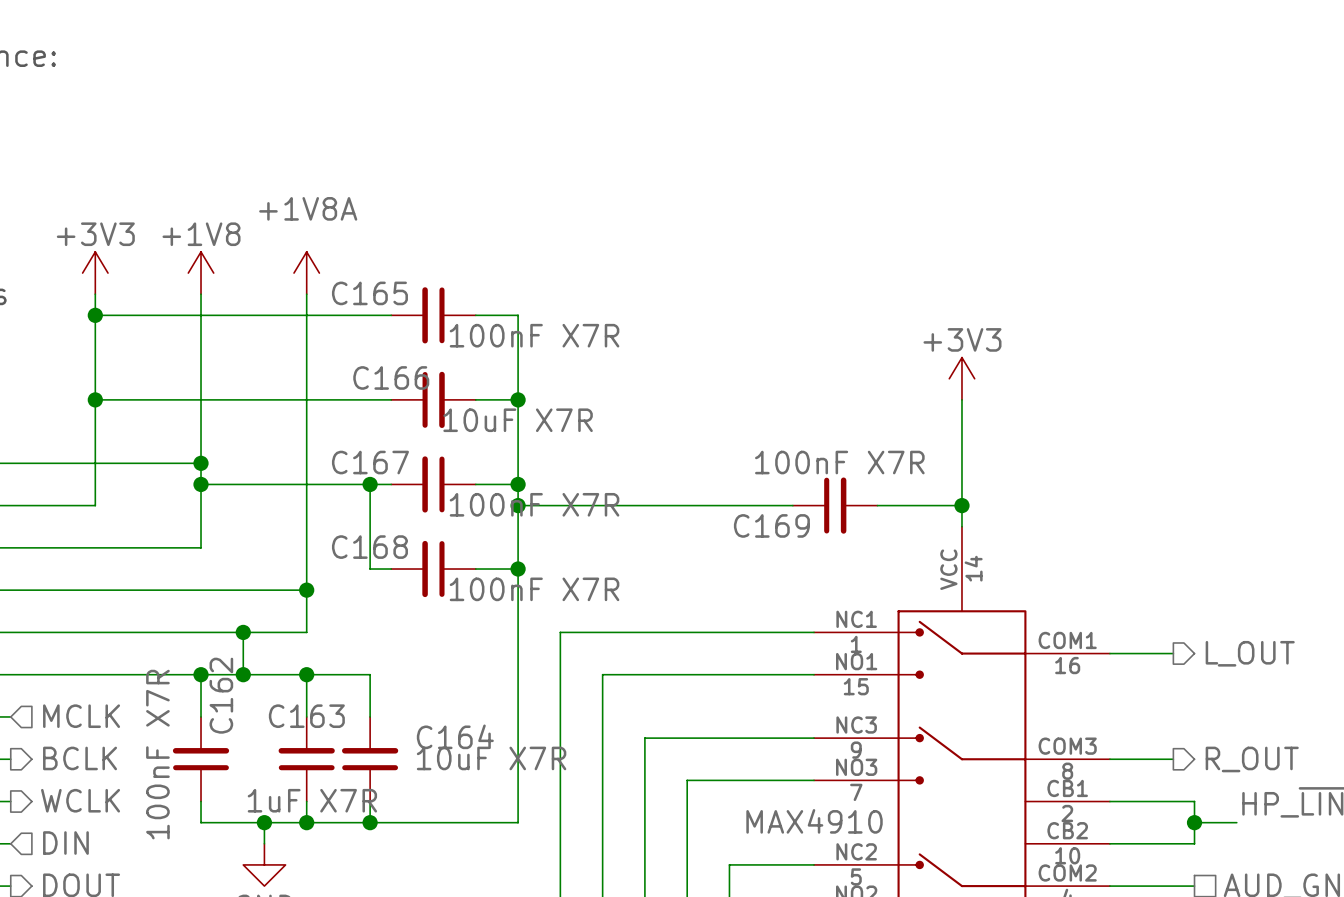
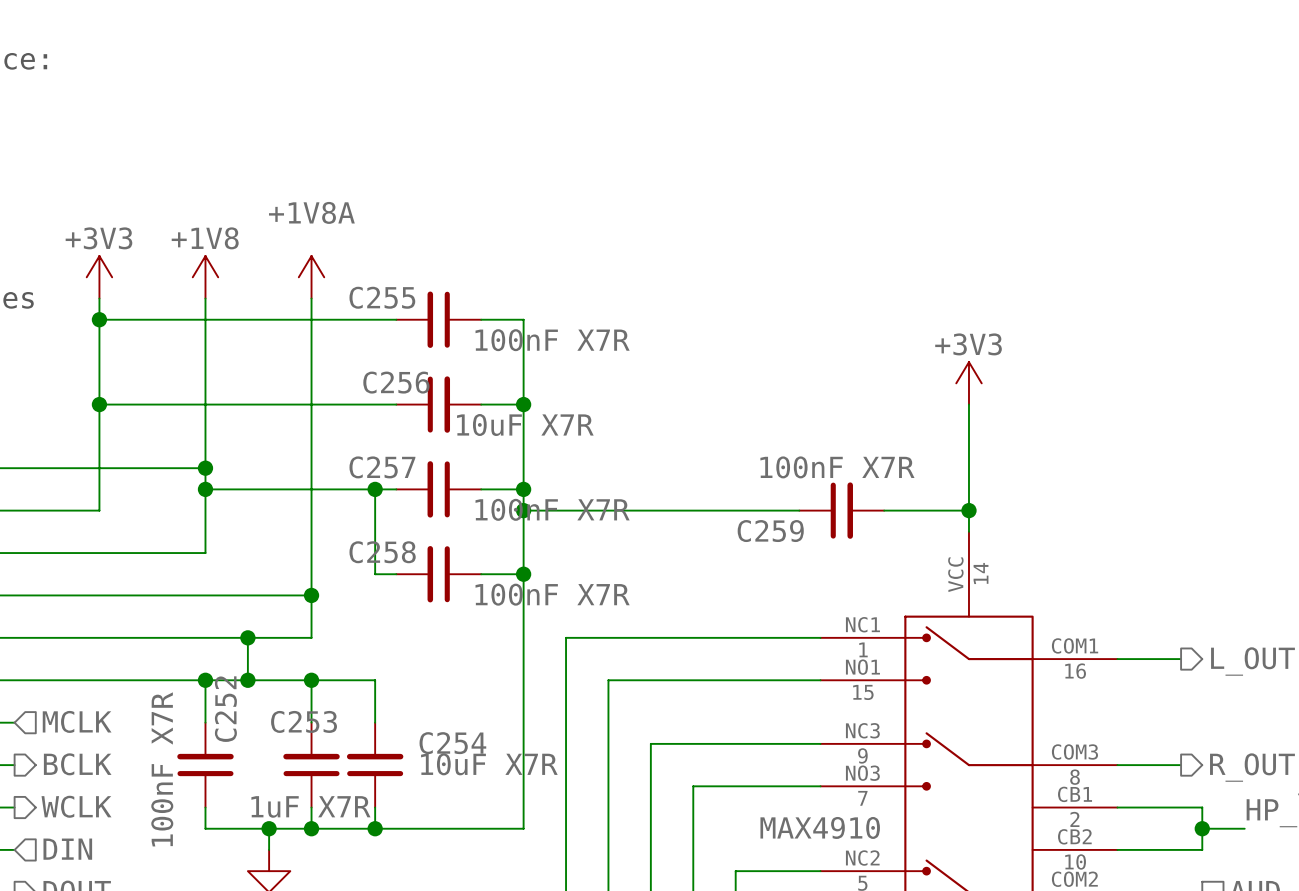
C165 name: C165 (369, 293) -> C255 (382, 297)
C166 name: C166 (391, 377) -> C256 (396, 382)
C167 name: C167 (370, 462) -> C257 (382, 467)
C169 name: C169 (771, 525) -> C259 (770, 531)
C168 name: C168 (369, 547) -> C258 (382, 552)
C162 name: C162 (221, 695) -> C252 (225, 709)
C163 name: C163 (306, 716) -> C253 (304, 721)
C164 name: C164 (455, 736) -> C254 (452, 743)

